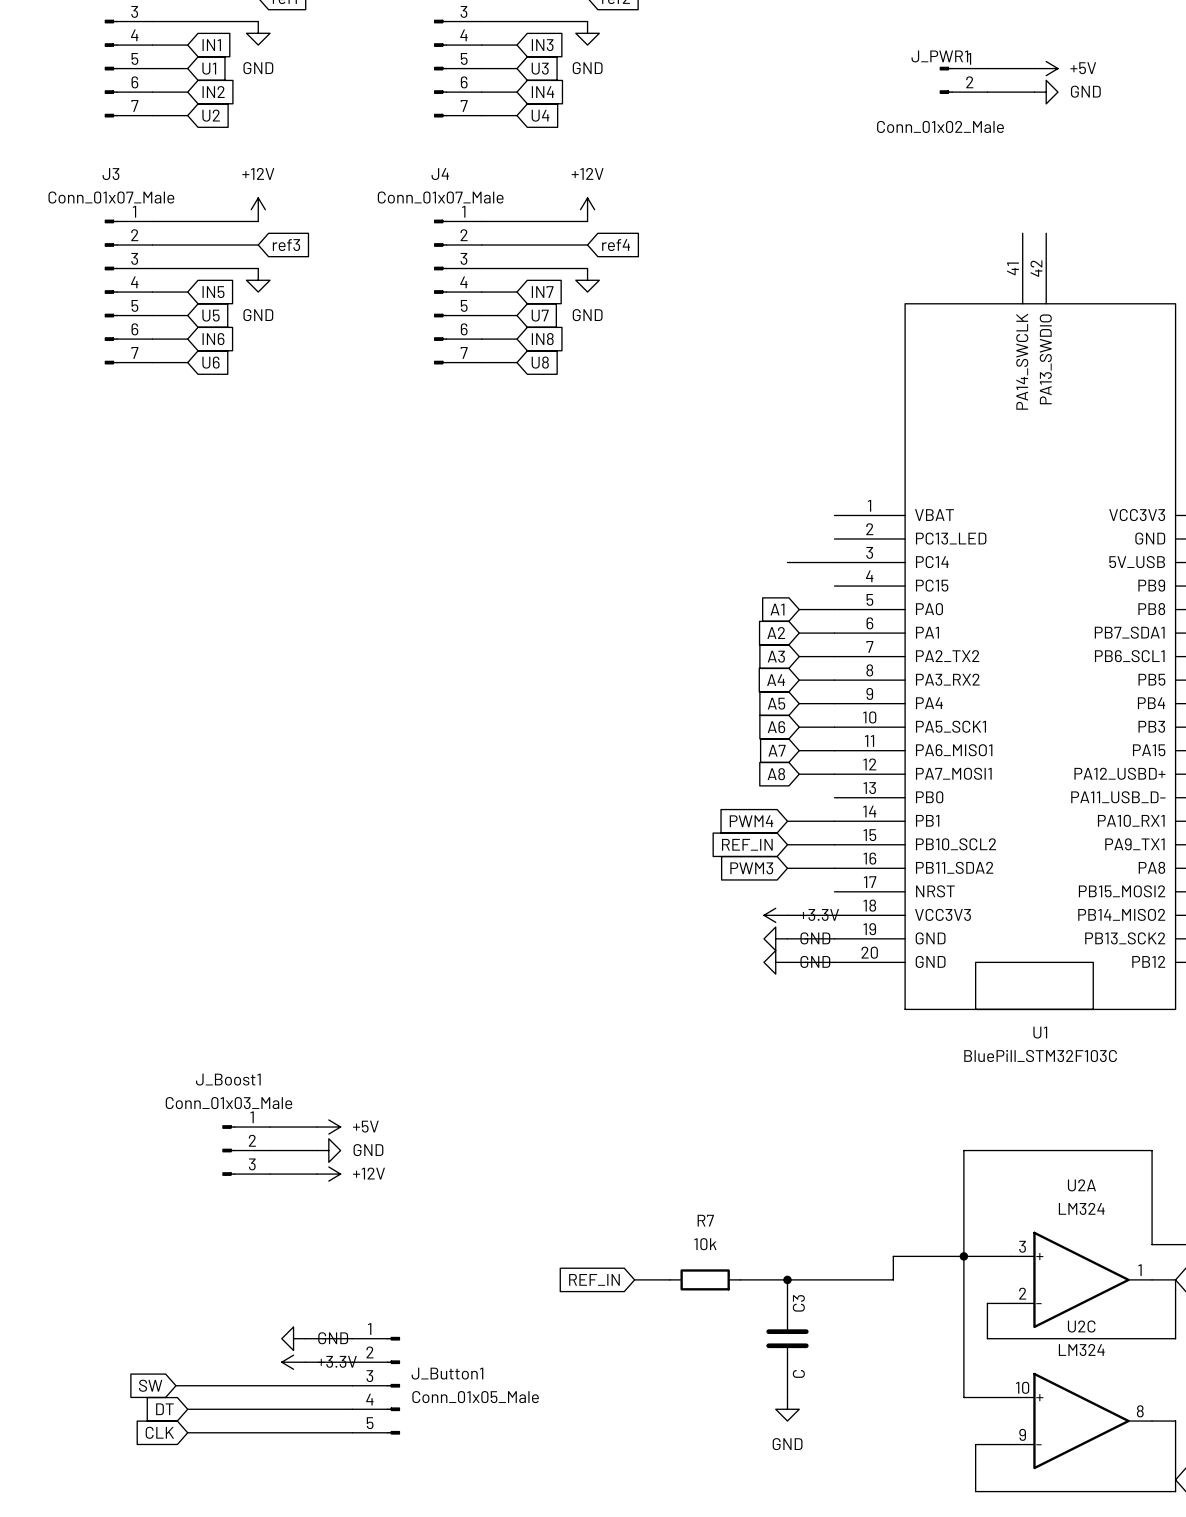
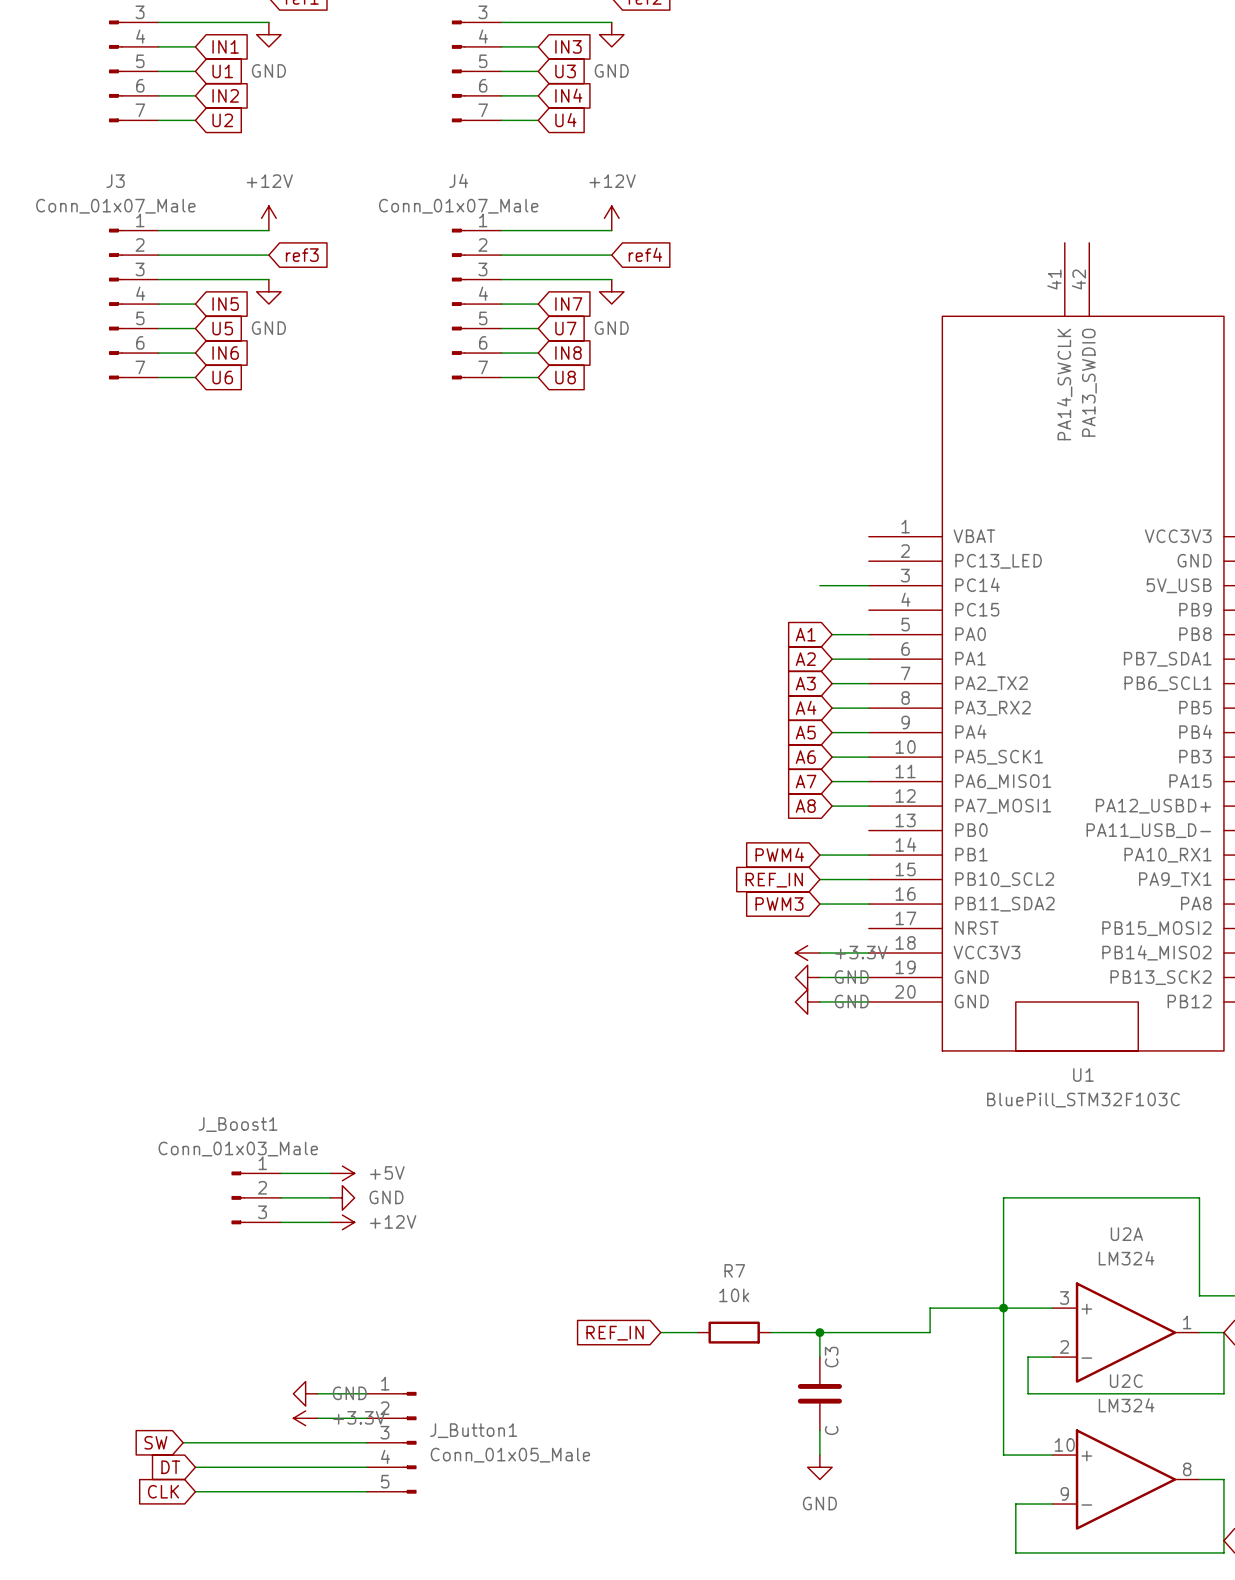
wire: (987, 68) (1034, 68) -> none
power symbol: +5V (1046, 68) -> none
J_PWR1: Conn_01x02_Male (963, 80) -> none
wire: (987, 92) (1034, 92) -> none
power symbol: GND (1046, 92) -> none

